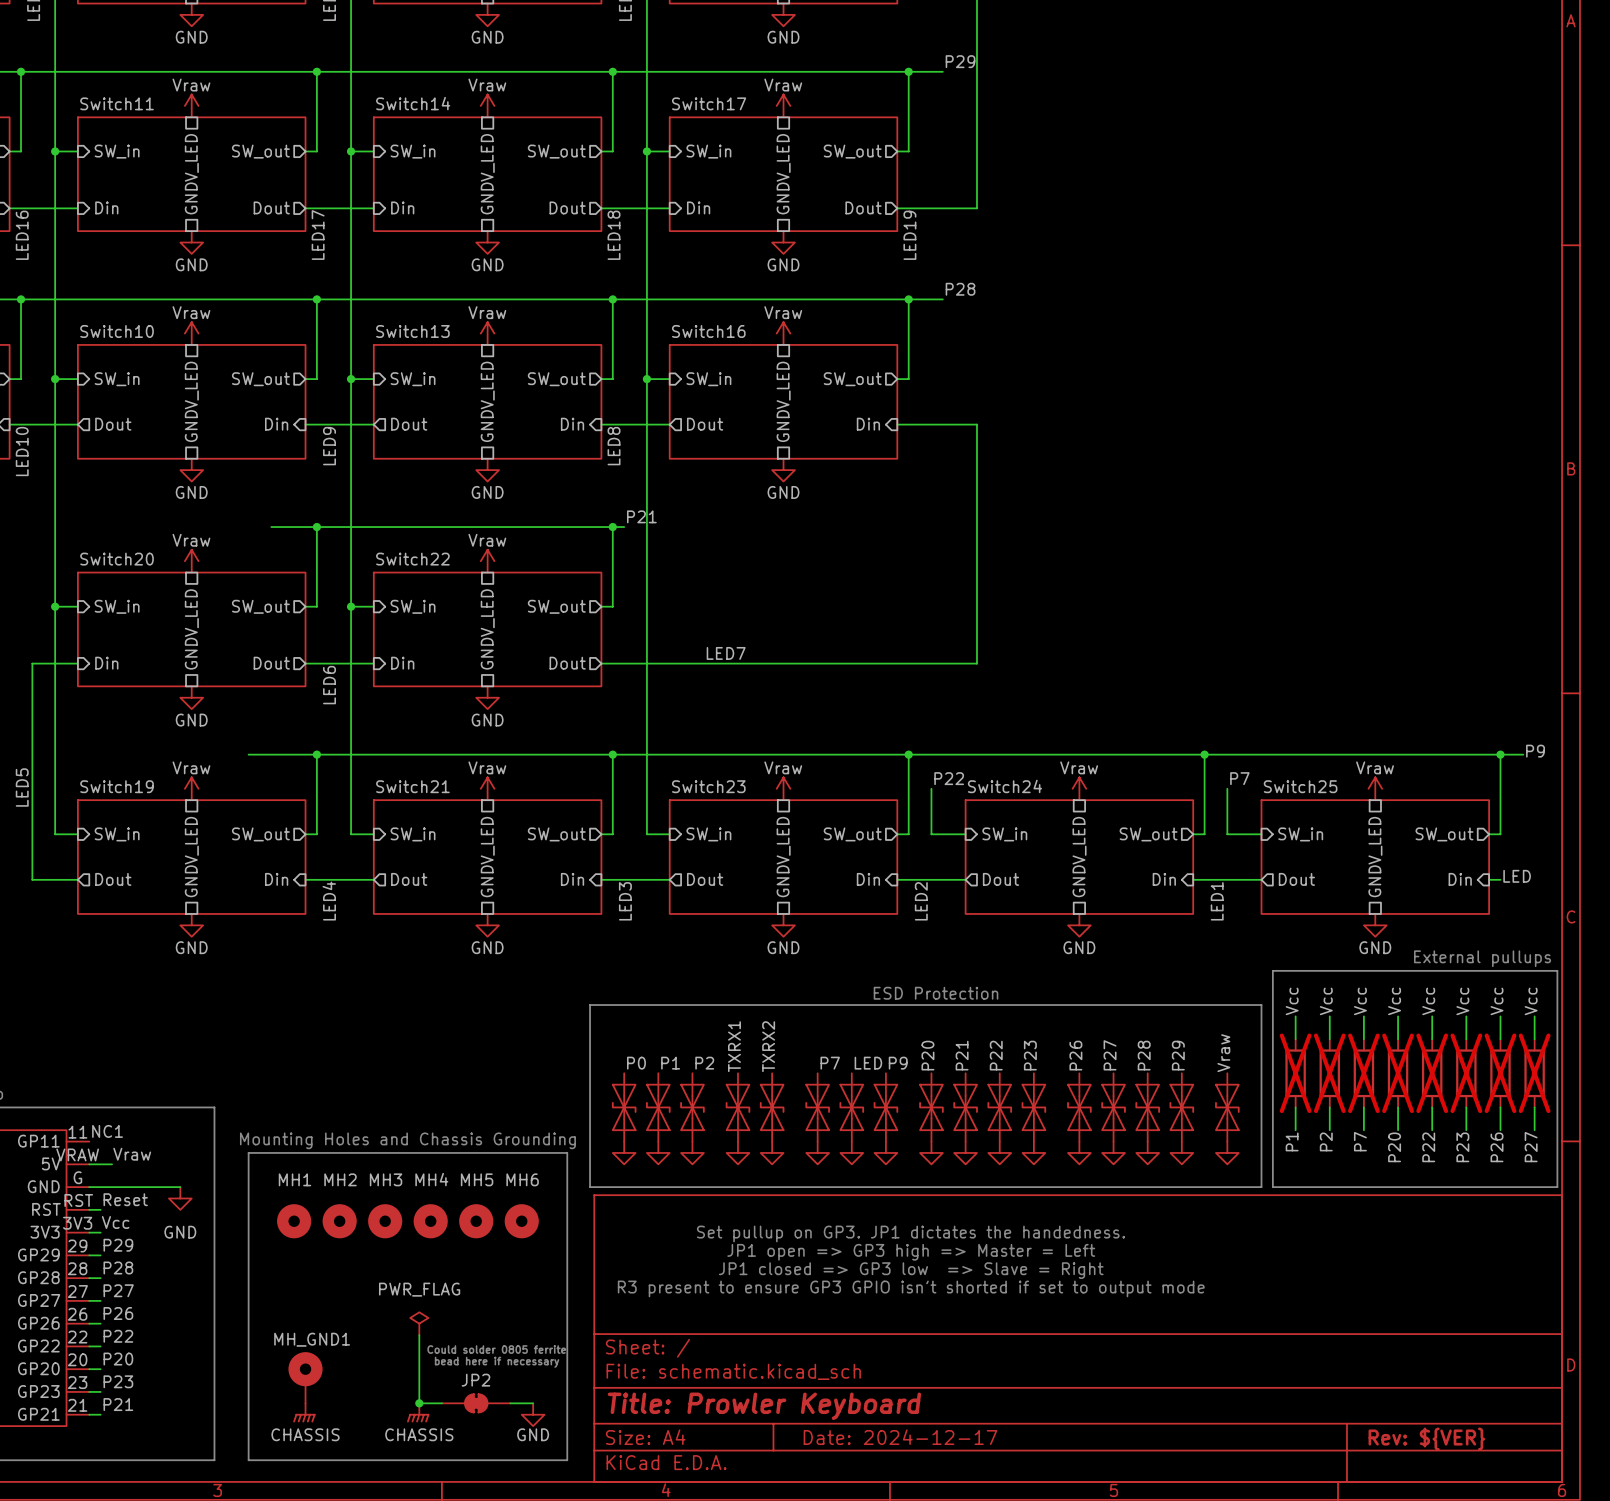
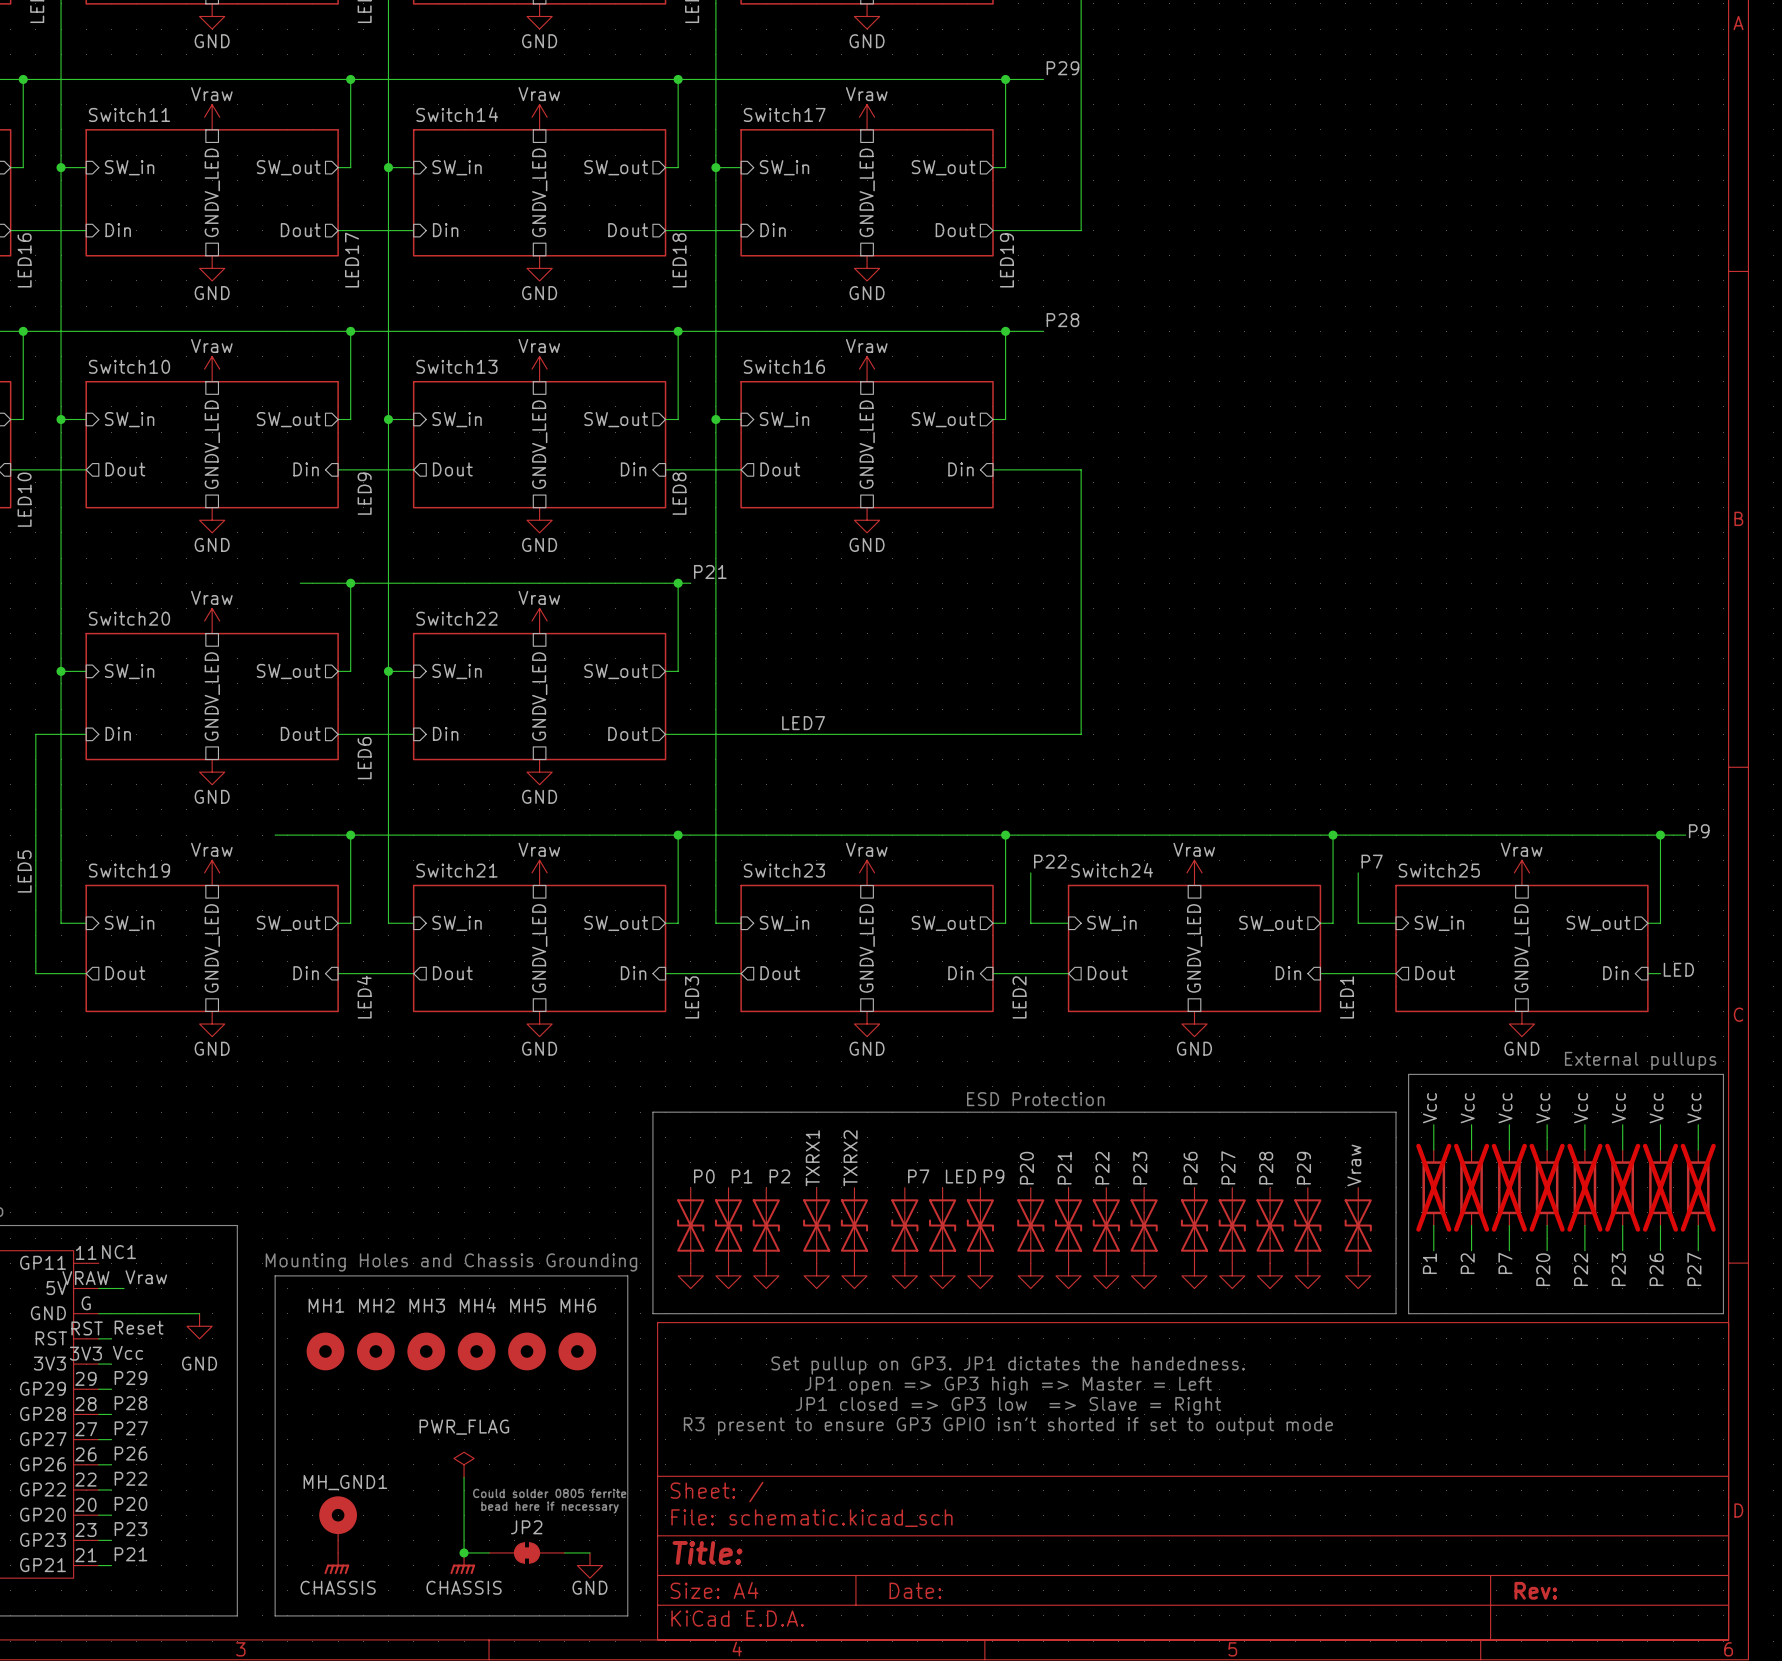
title block: Title: Prowler Keyboard (764, 1406) -> Title: (707, 1552)
title block: Date: 2024-12-17 (900, 1437) -> Date: (915, 1590)
title block: Rev: ${VER} (1426, 1439) -> Rev: (1535, 1590)

